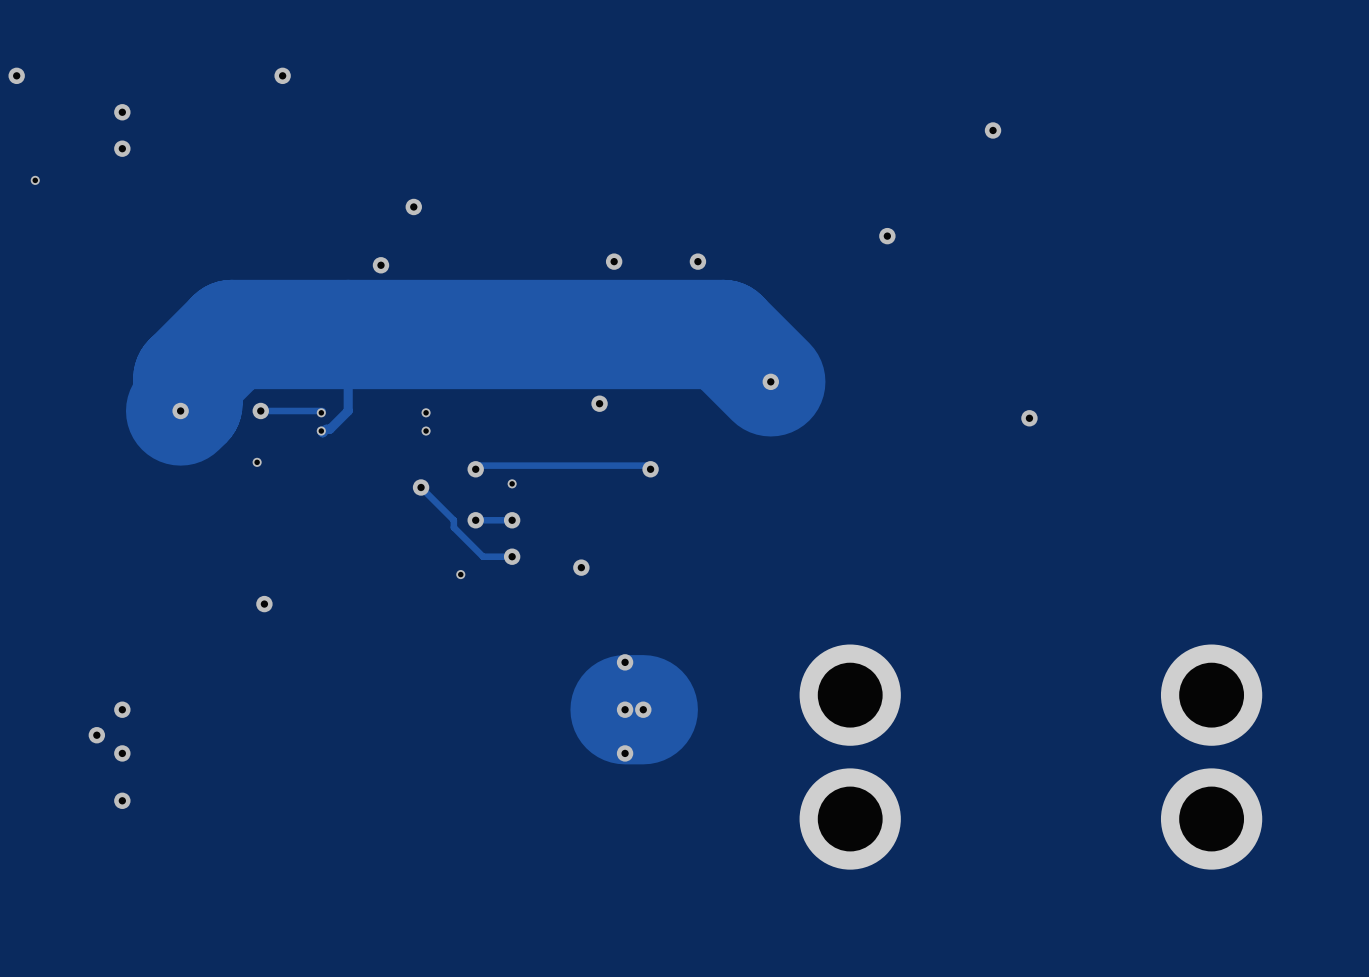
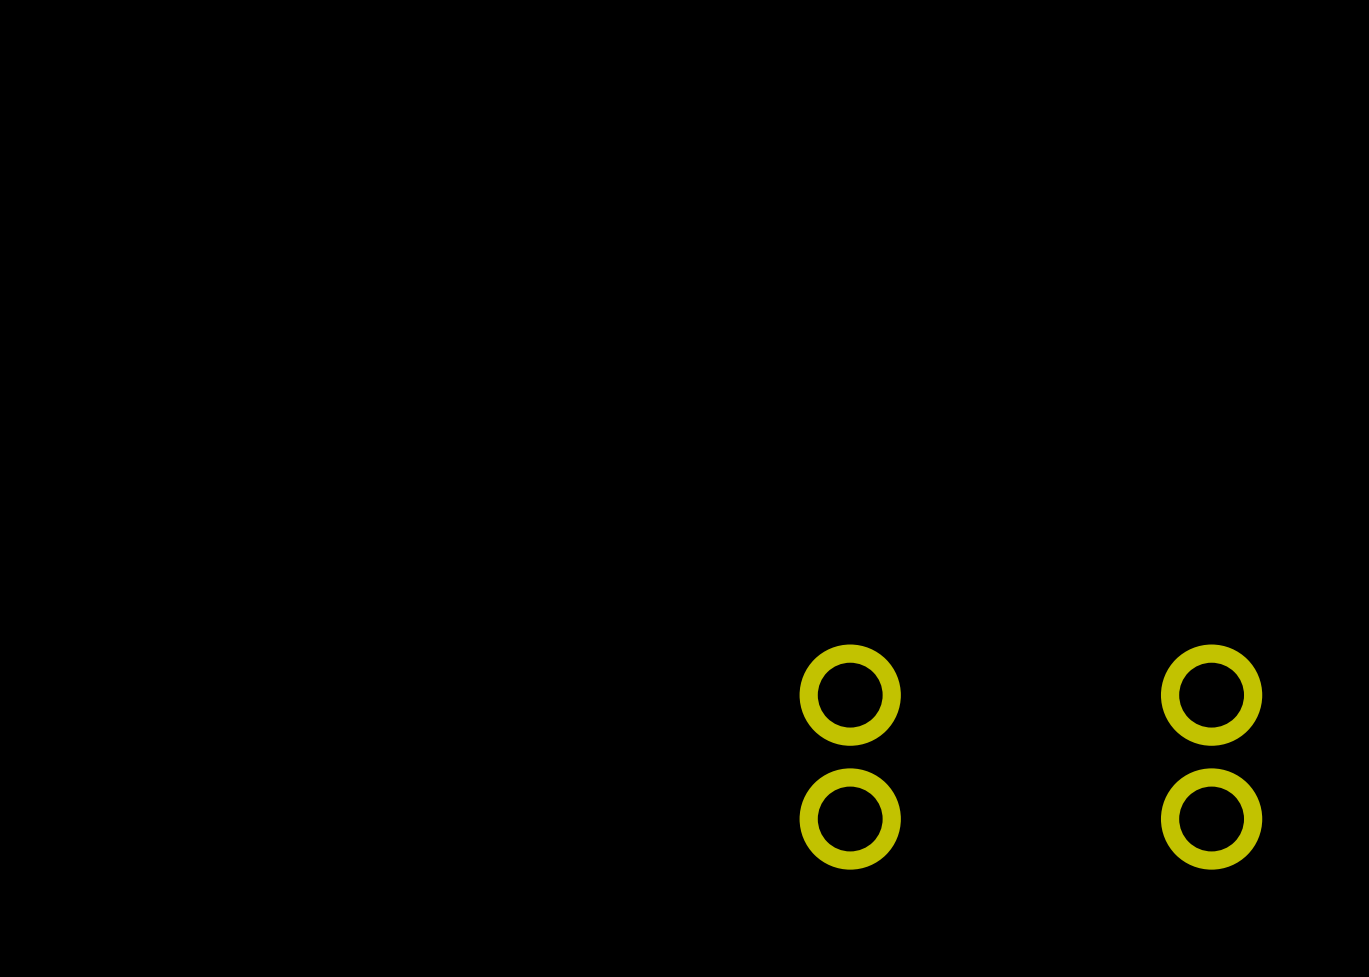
via: (16, 75) -> none
via: (282, 75) -> none
via: (122, 112) -> none
via: (993, 130) -> none
via: (122, 148) -> none
via: (35, 180) -> none
via: (413, 206) -> none
via: (887, 236) -> none
via: (614, 261) -> none
via: (697, 261) -> none
via: (380, 265) -> none
track: (348, 334) (348, 410) (329, 429) (326, 429) (322, 432) (321, 431) -> none
track: (770, 381) (723, 334) (231, 334) (187, 378) (187, 403) (180, 410) -> none
via: (770, 381) -> none
via: (599, 403) -> none
via: (180, 410) -> none
via: (260, 410) -> none
track: (322, 410) (260, 410) -> none
via: (321, 412) -> none
via: (426, 412) -> none
via: (1029, 418) -> none
via: (321, 431) -> none
via: (426, 431) -> none
via: (257, 462) -> none
via: (475, 469) -> none
track: (650, 469) (646, 465) (479, 465) (475, 469) -> none
via: (650, 469) -> none
via: (512, 483) -> none
track: (421, 487) (453, 520) (453, 527) (482, 556) (512, 556) -> none
via: (421, 487) -> none
via: (475, 520) -> none
track: (512, 520) (475, 520) -> none
via: (512, 520) -> none
via: (512, 556) -> none
via: (581, 567) -> none
via: (460, 574) -> none
via: (264, 604) -> none
via: (625, 662) -> none
via: (122, 709) -> none
via: (625, 709) -> none
track: (643, 709) (625, 709) -> none
via: (643, 709) -> none
via: (96, 735) -> none
via: (122, 753) -> none
via: (625, 753) -> none
via: (122, 800) -> none

